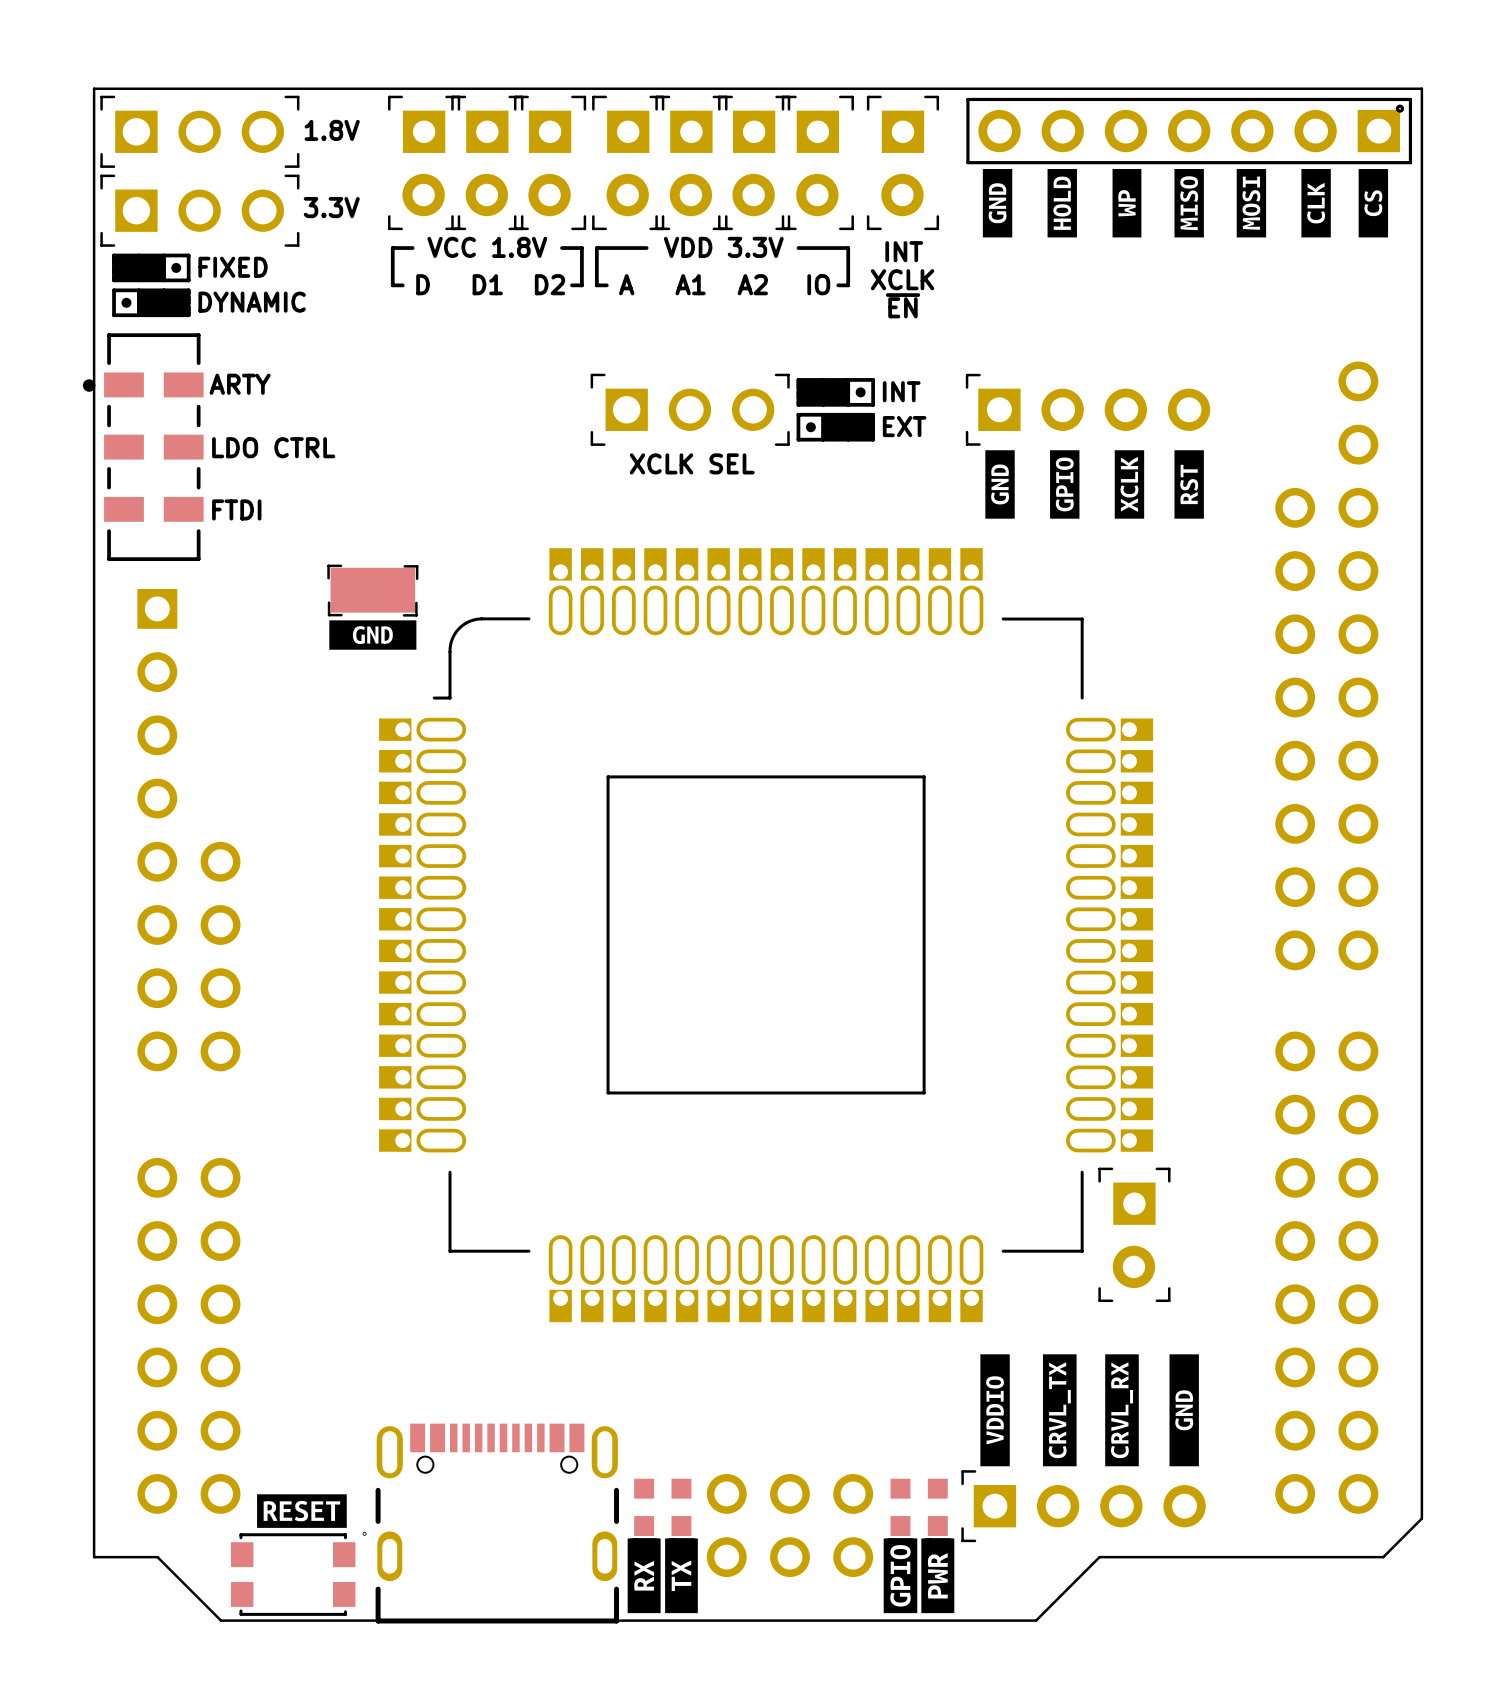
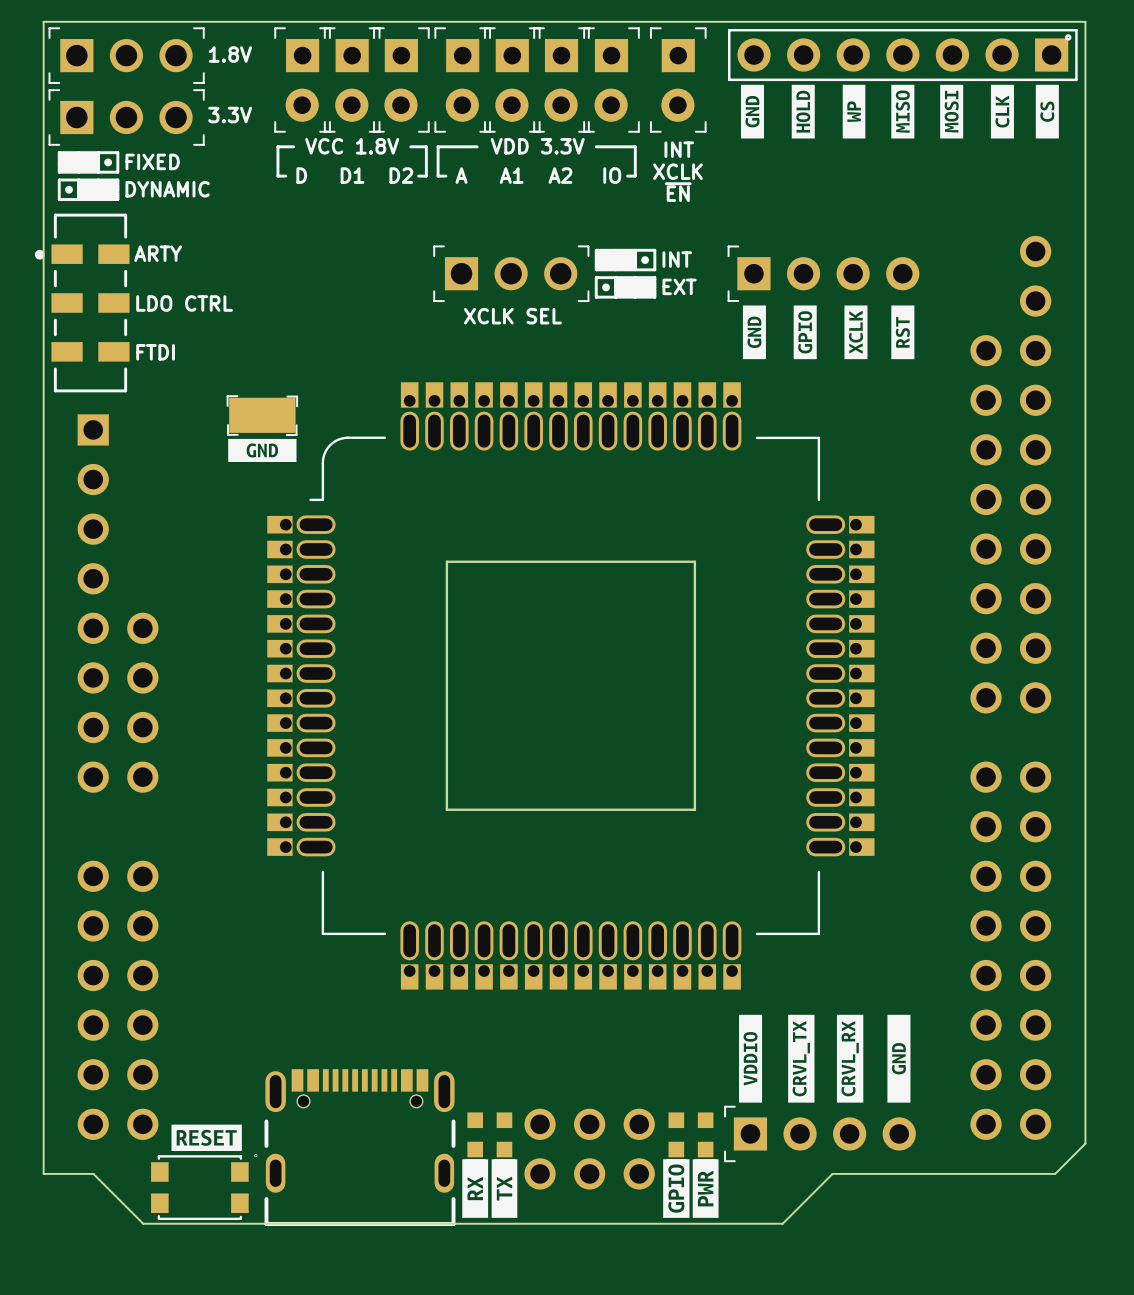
part: (1134, 1234) -> none

